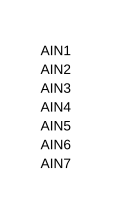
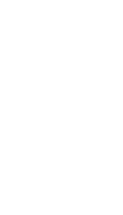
label: AIN1 (55, 50) -> none
label: AIN2 (55, 69) -> none
label: AIN3 (55, 88) -> none
label: AIN4 (55, 106) -> none
label: AIN5 (55, 125) -> none
label: AIN6 (55, 144) -> none
label: AIN7 (55, 163) -> none

